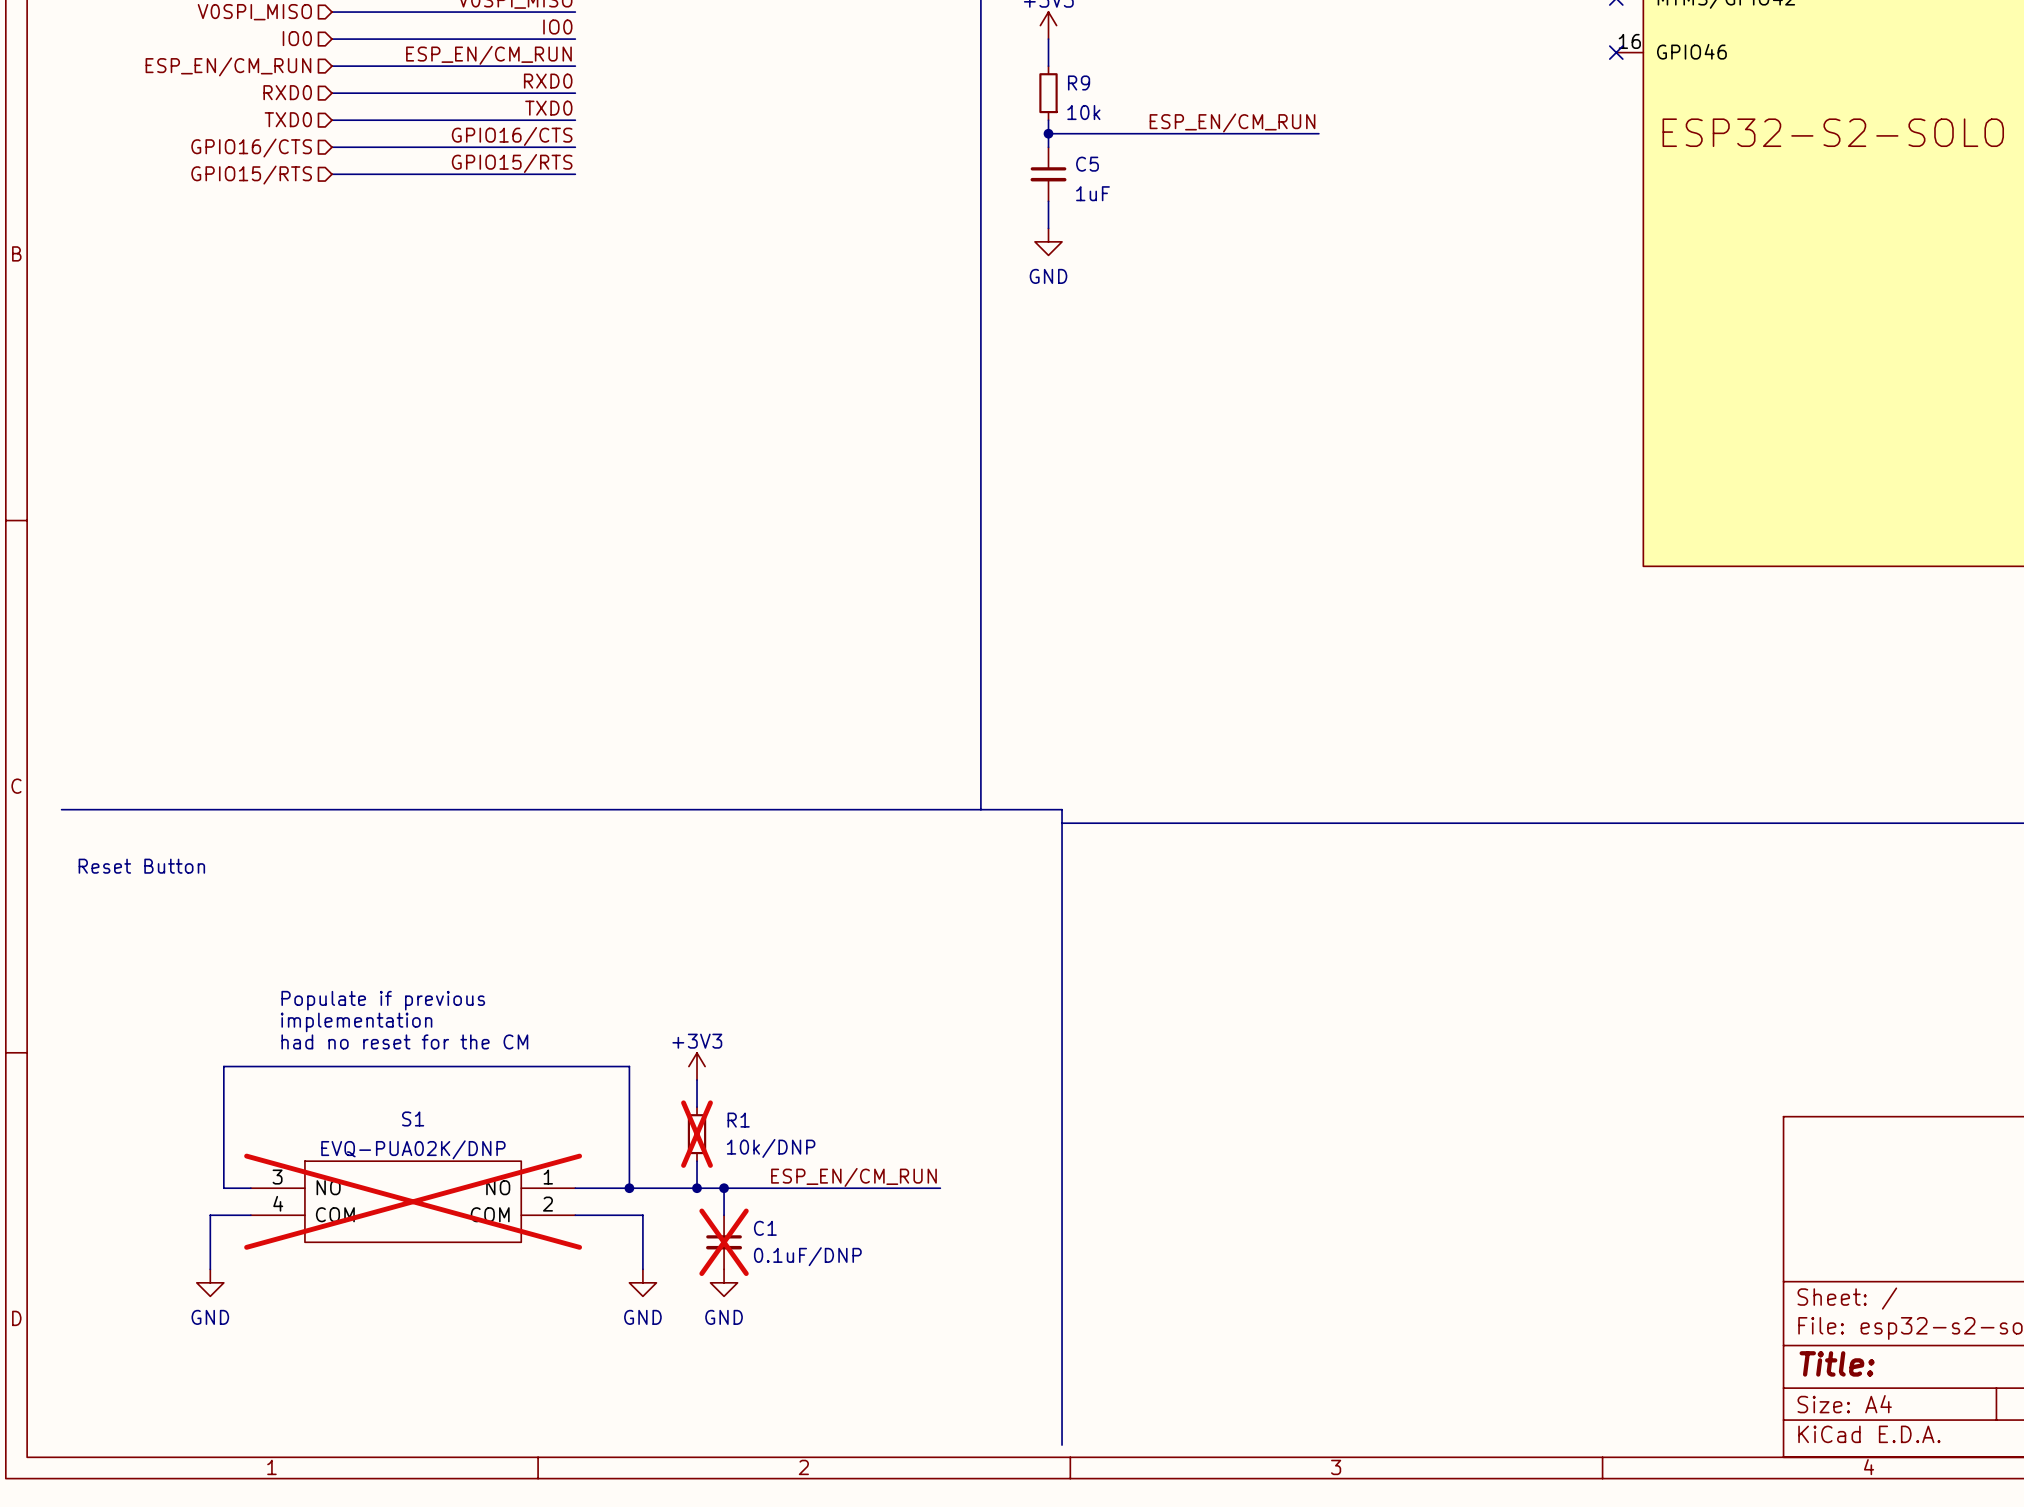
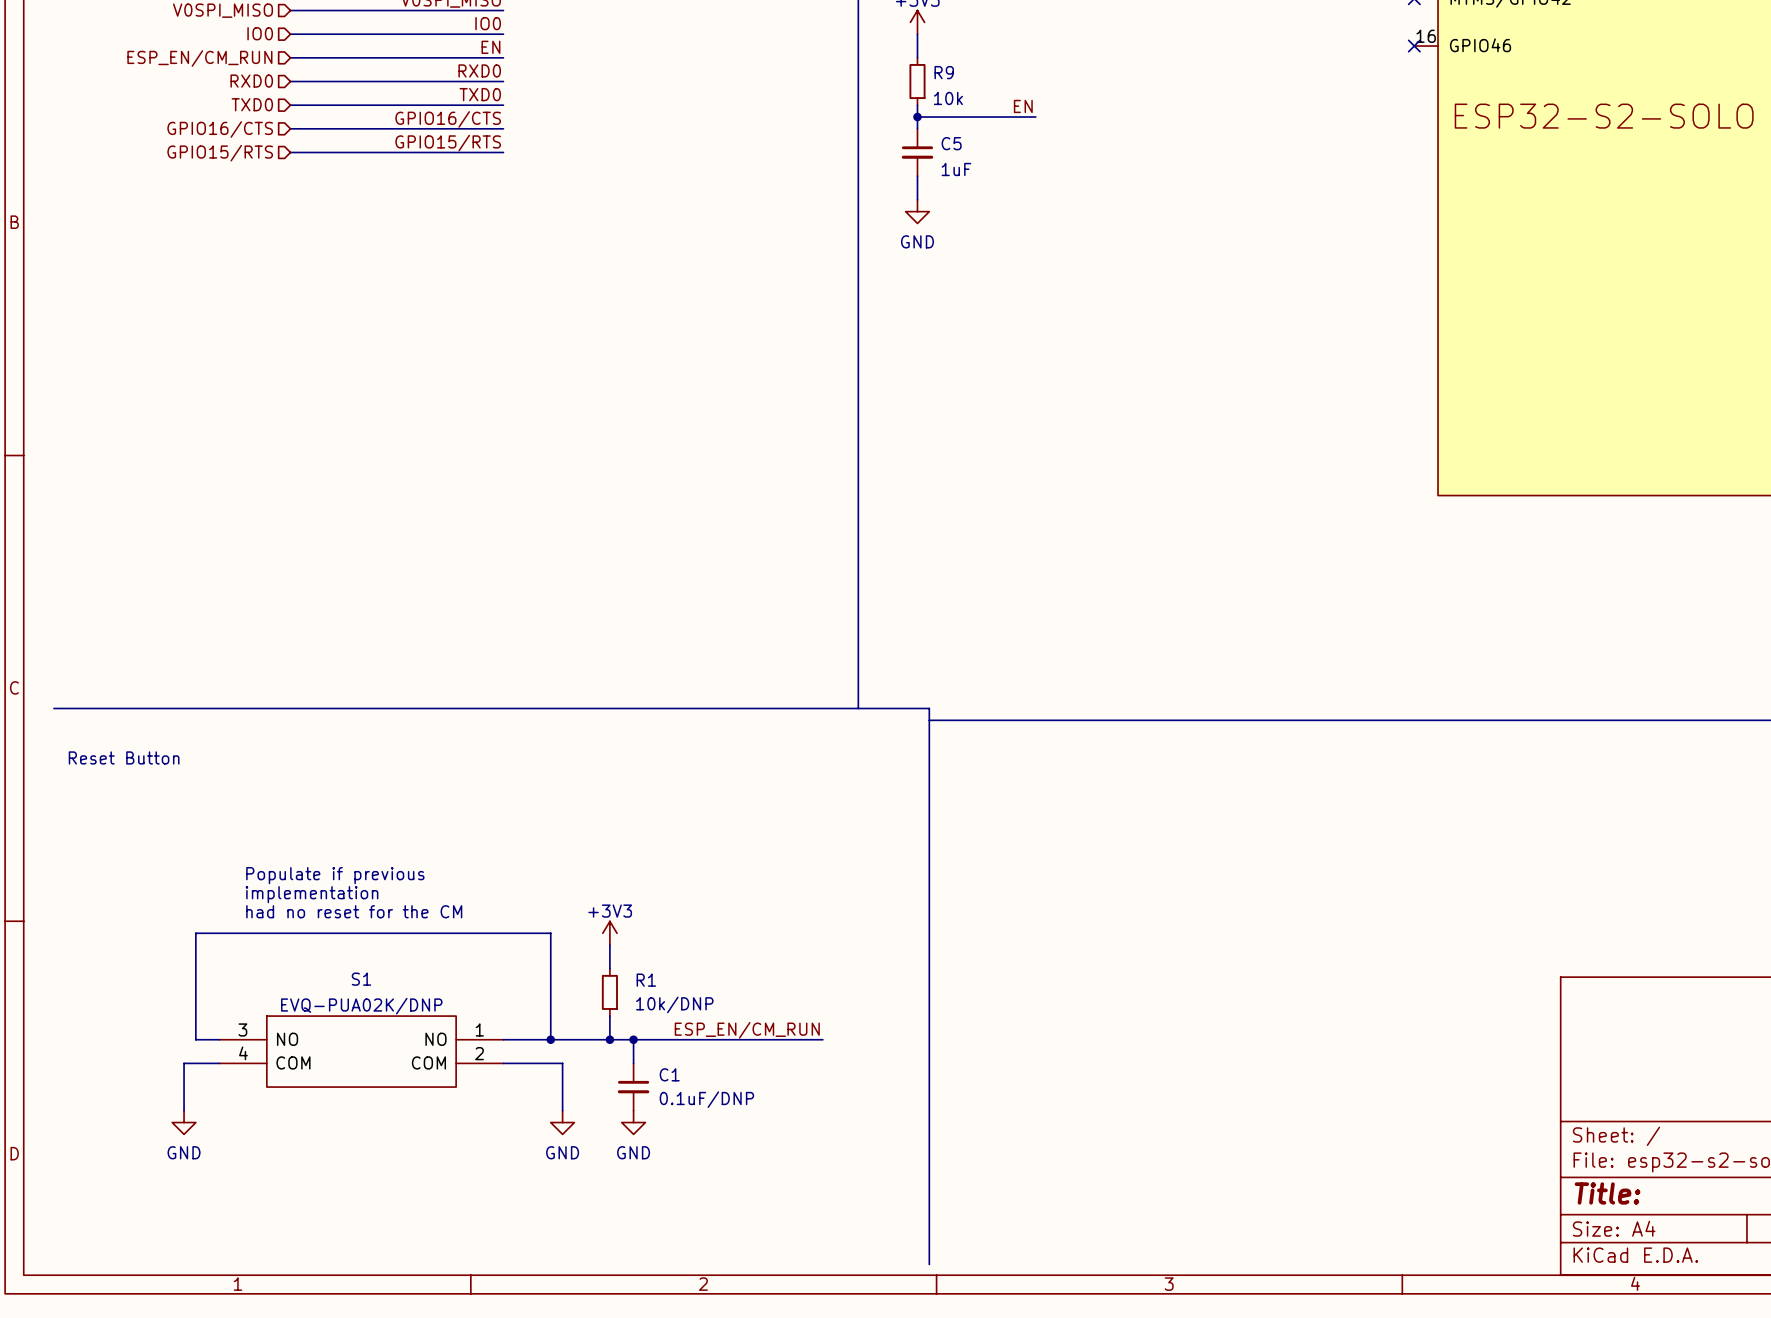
label: ESP_EN/CM_RUN (488, 55) -> EN (490, 47)
label: none -> EN (1023, 106)
label: ESP_EN/CM_RUN (1232, 122) -> none
wire: (1183, 133) (1318, 133) -> none
R1 do-not-place cross: (697, 1134) -> none
S1 do-not-place cross: (413, 1201) -> none
C1 do-not-place cross: (724, 1242) -> none

